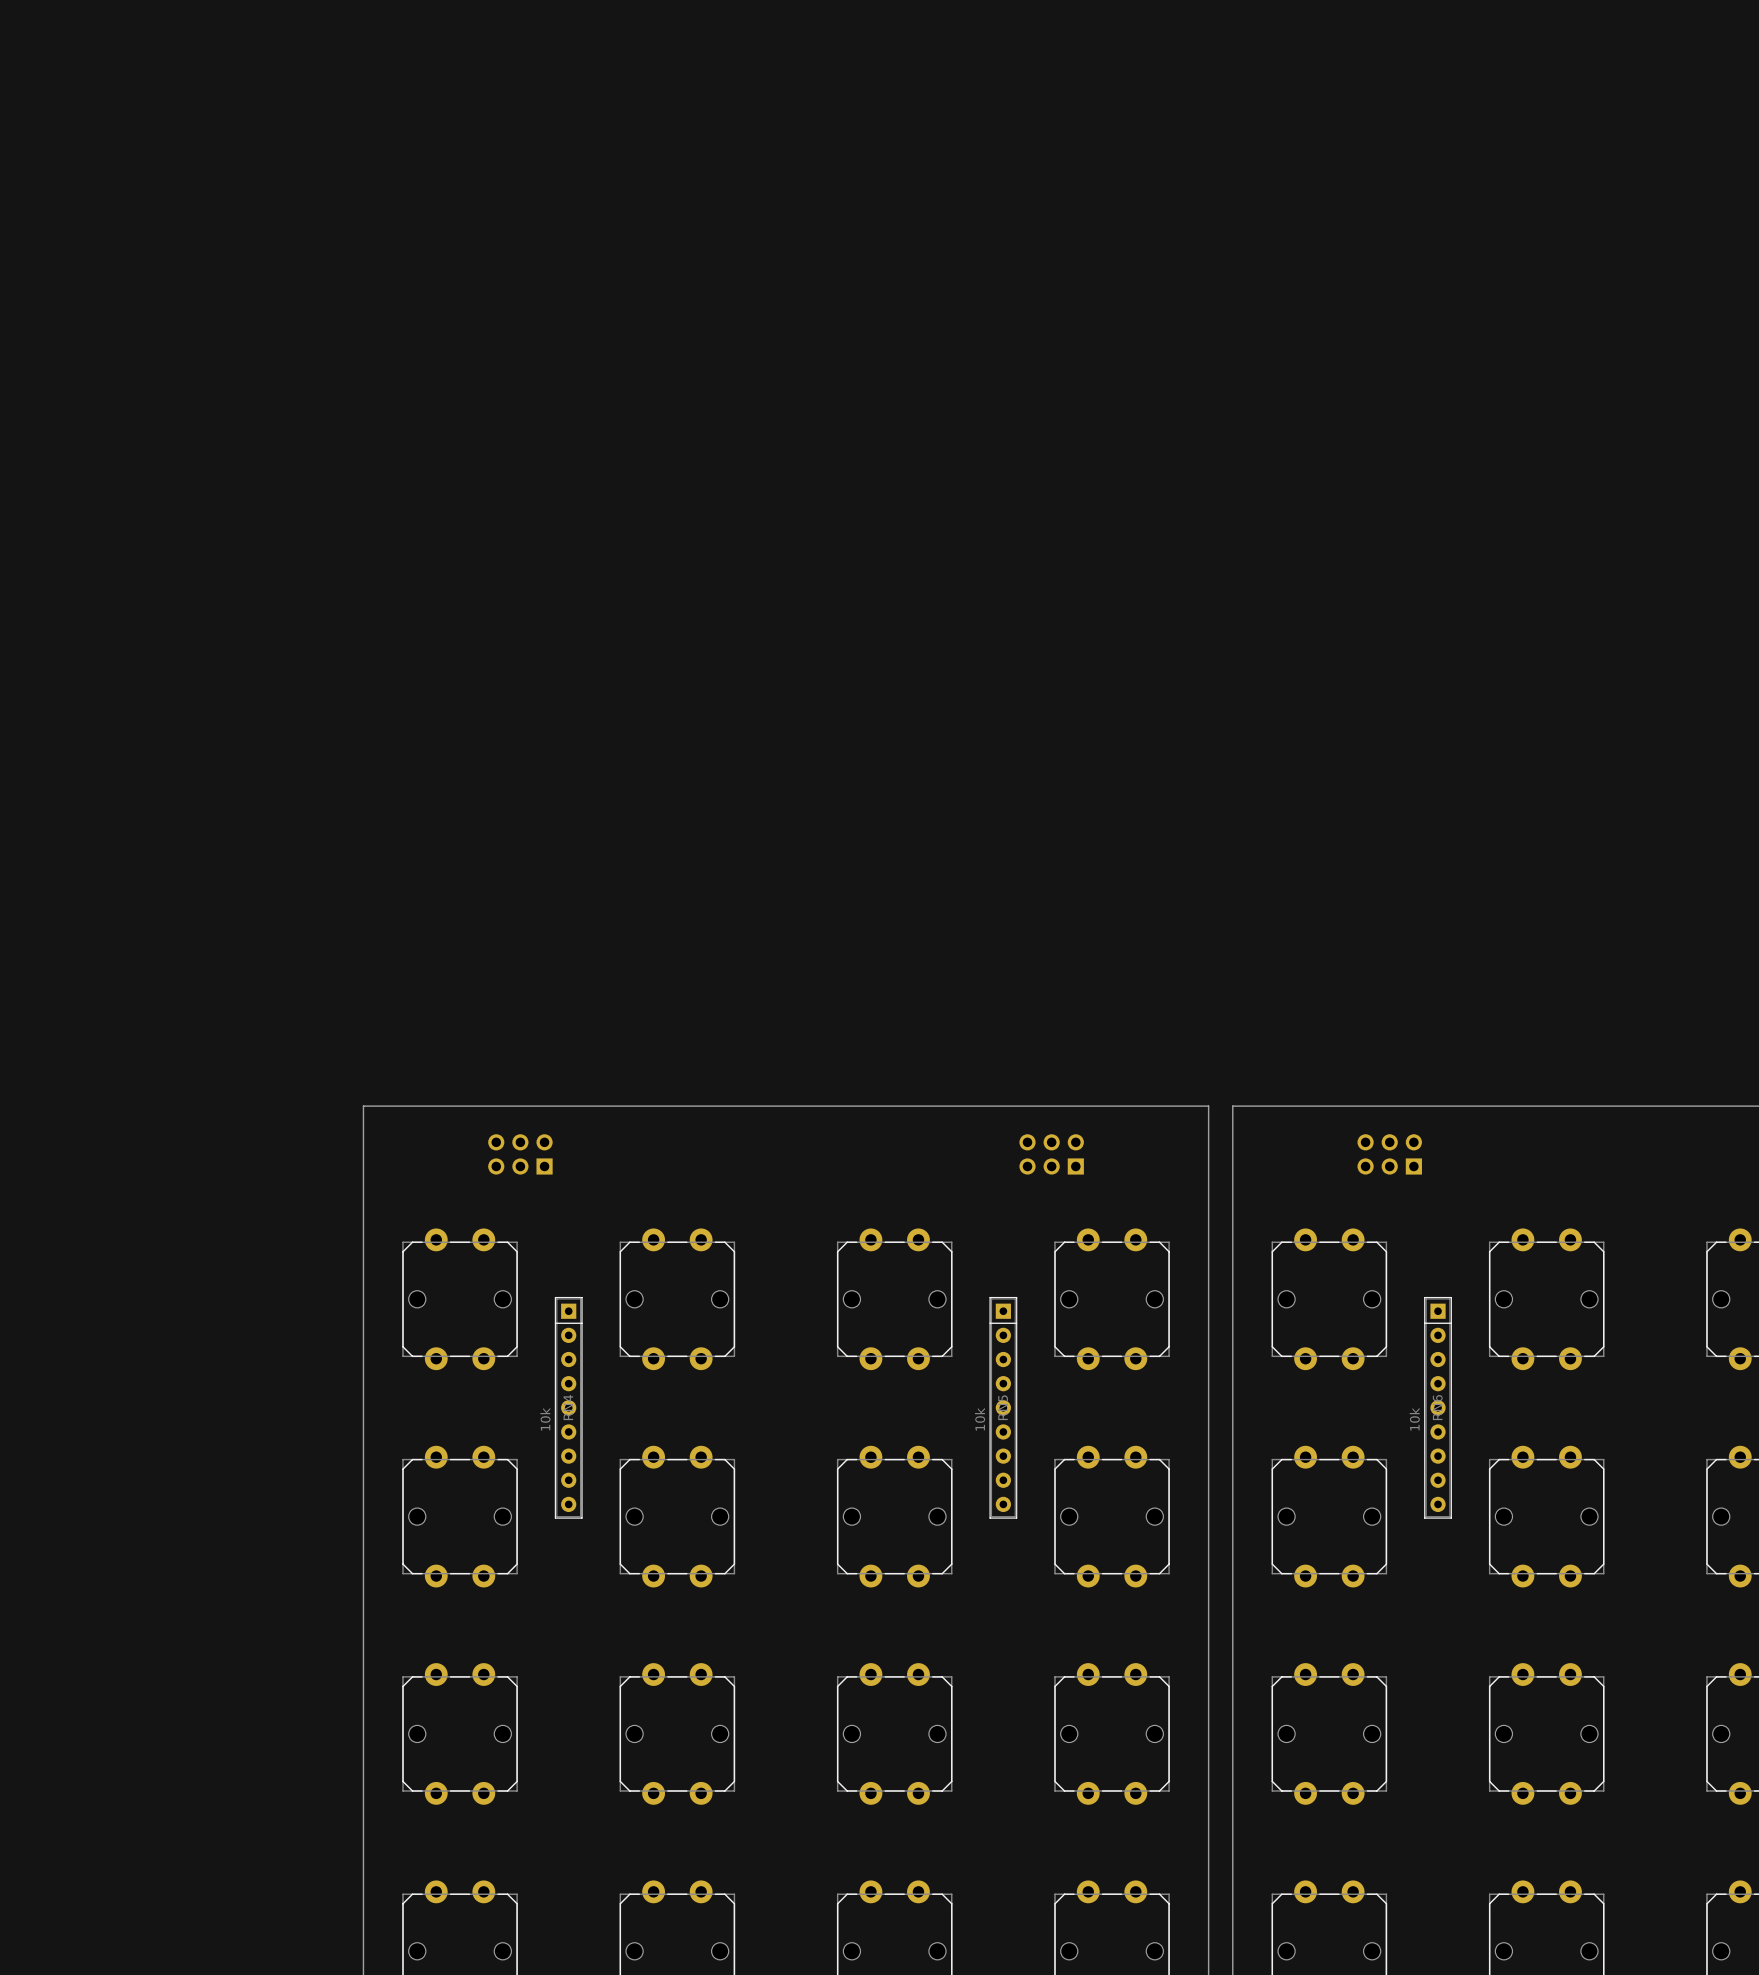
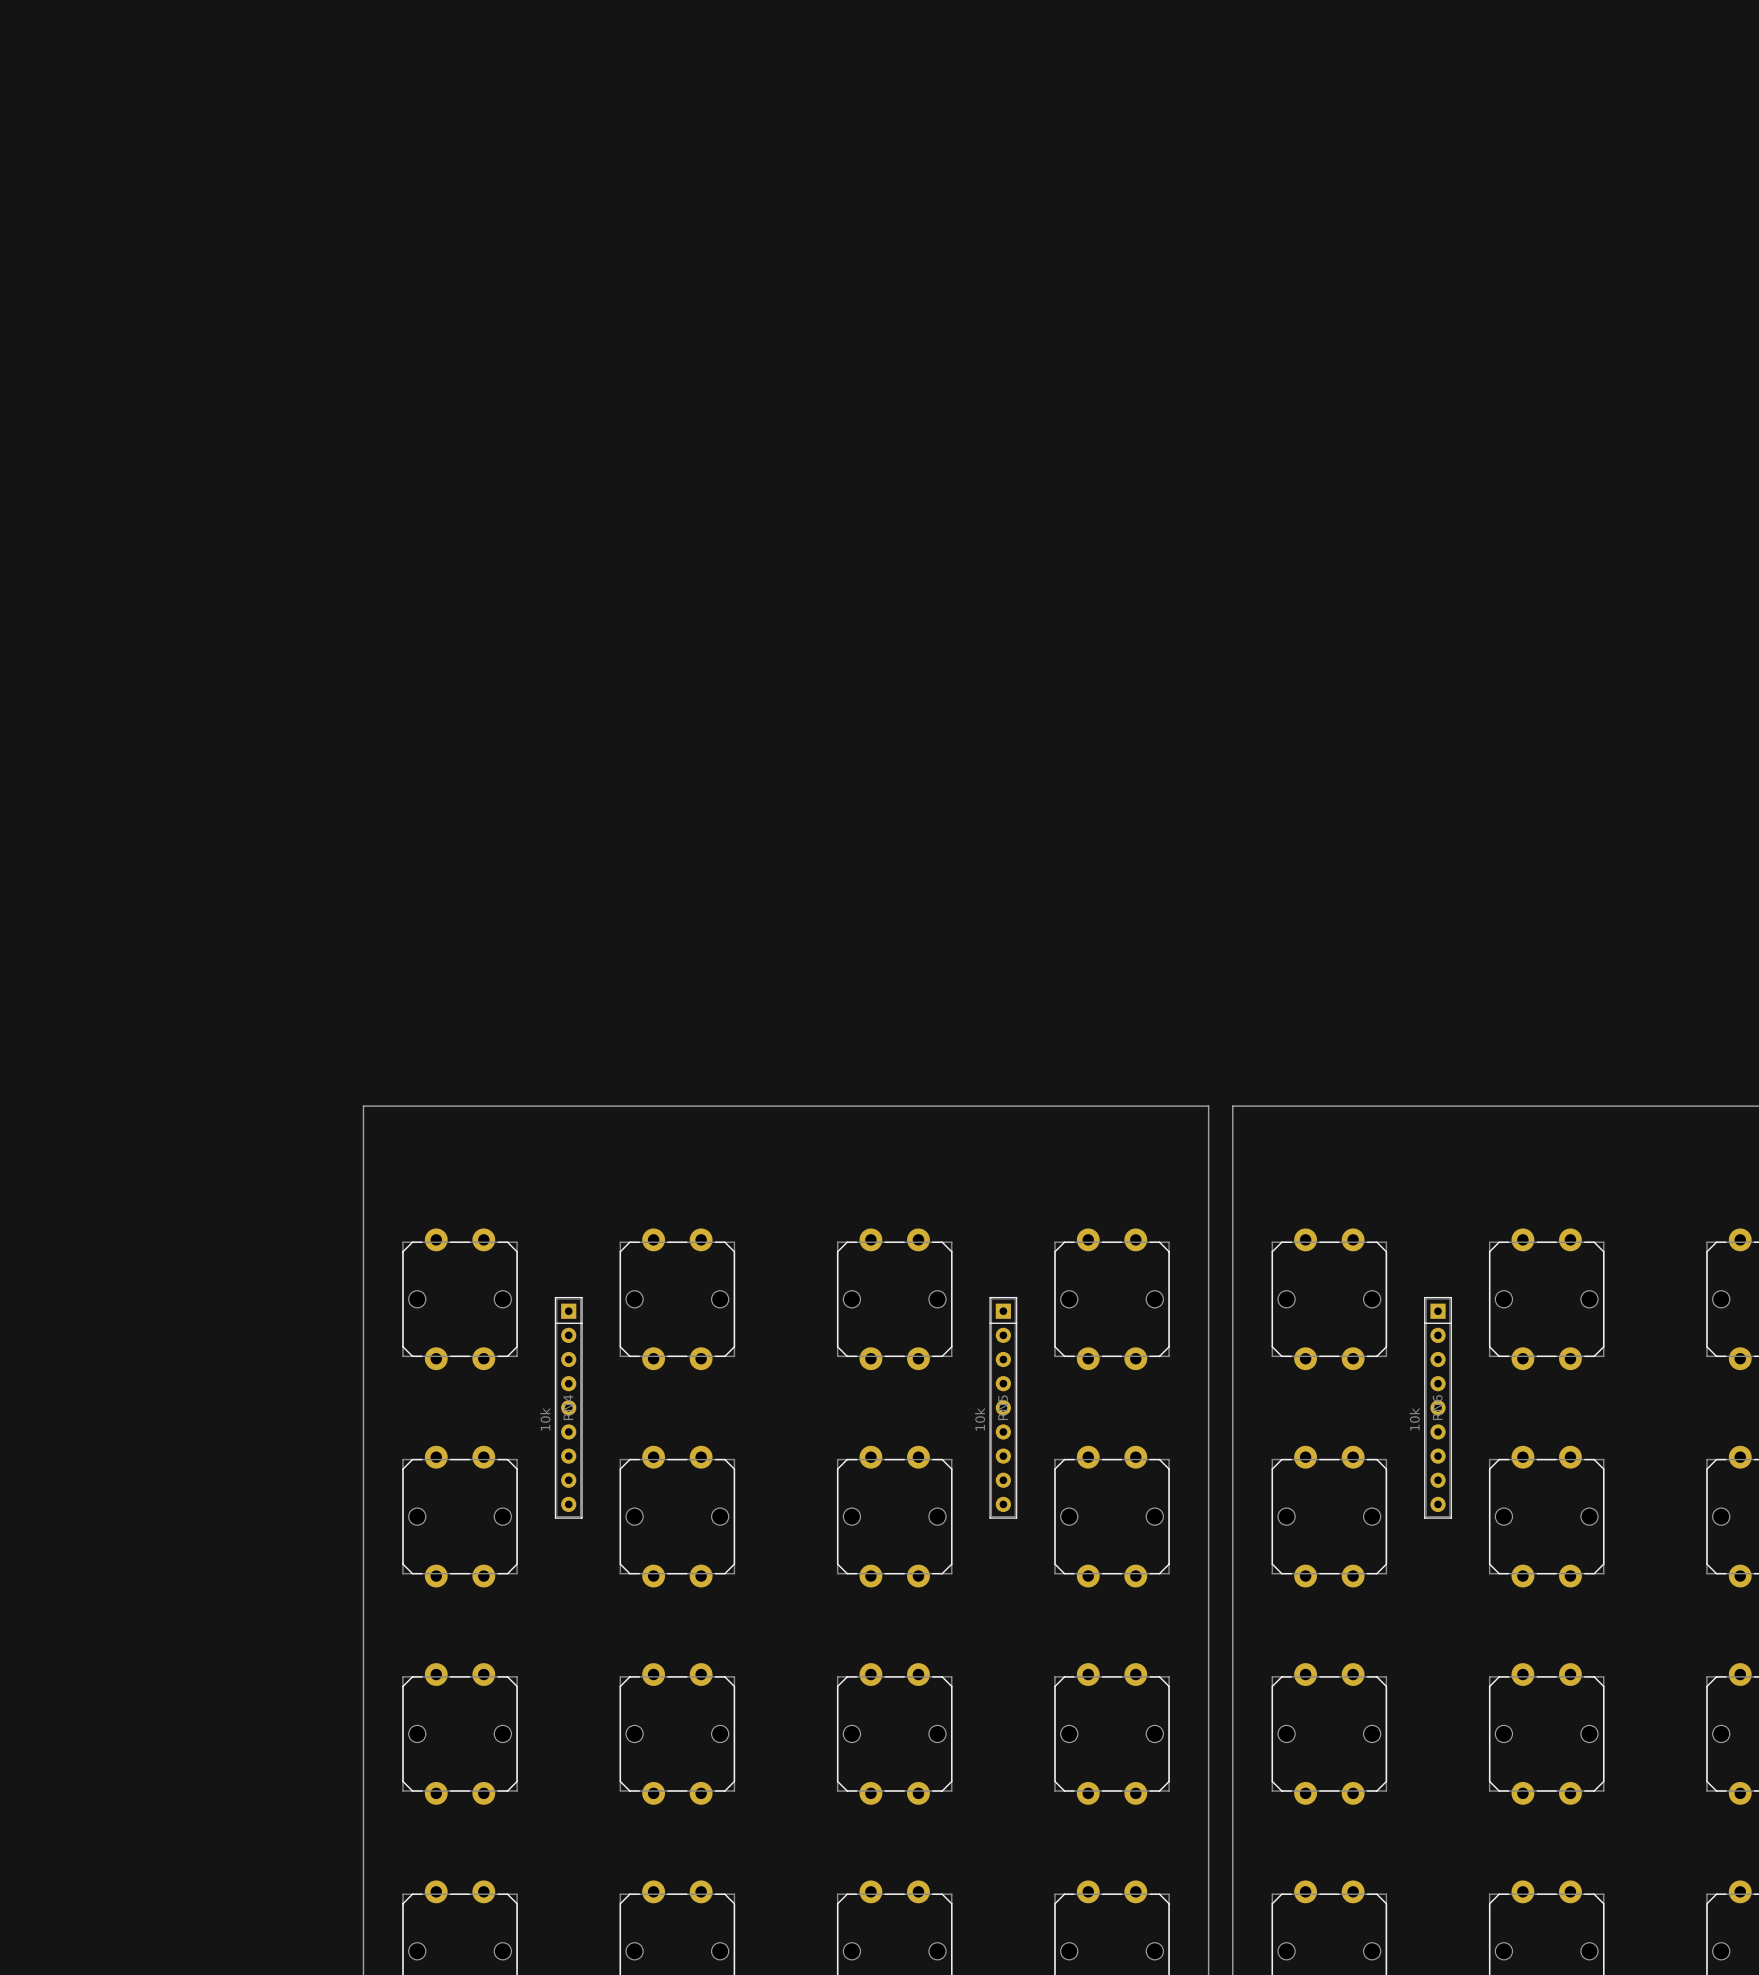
part: (520, 1154) -> none
part: (1051, 1154) -> none
part: (1389, 1154) -> none

